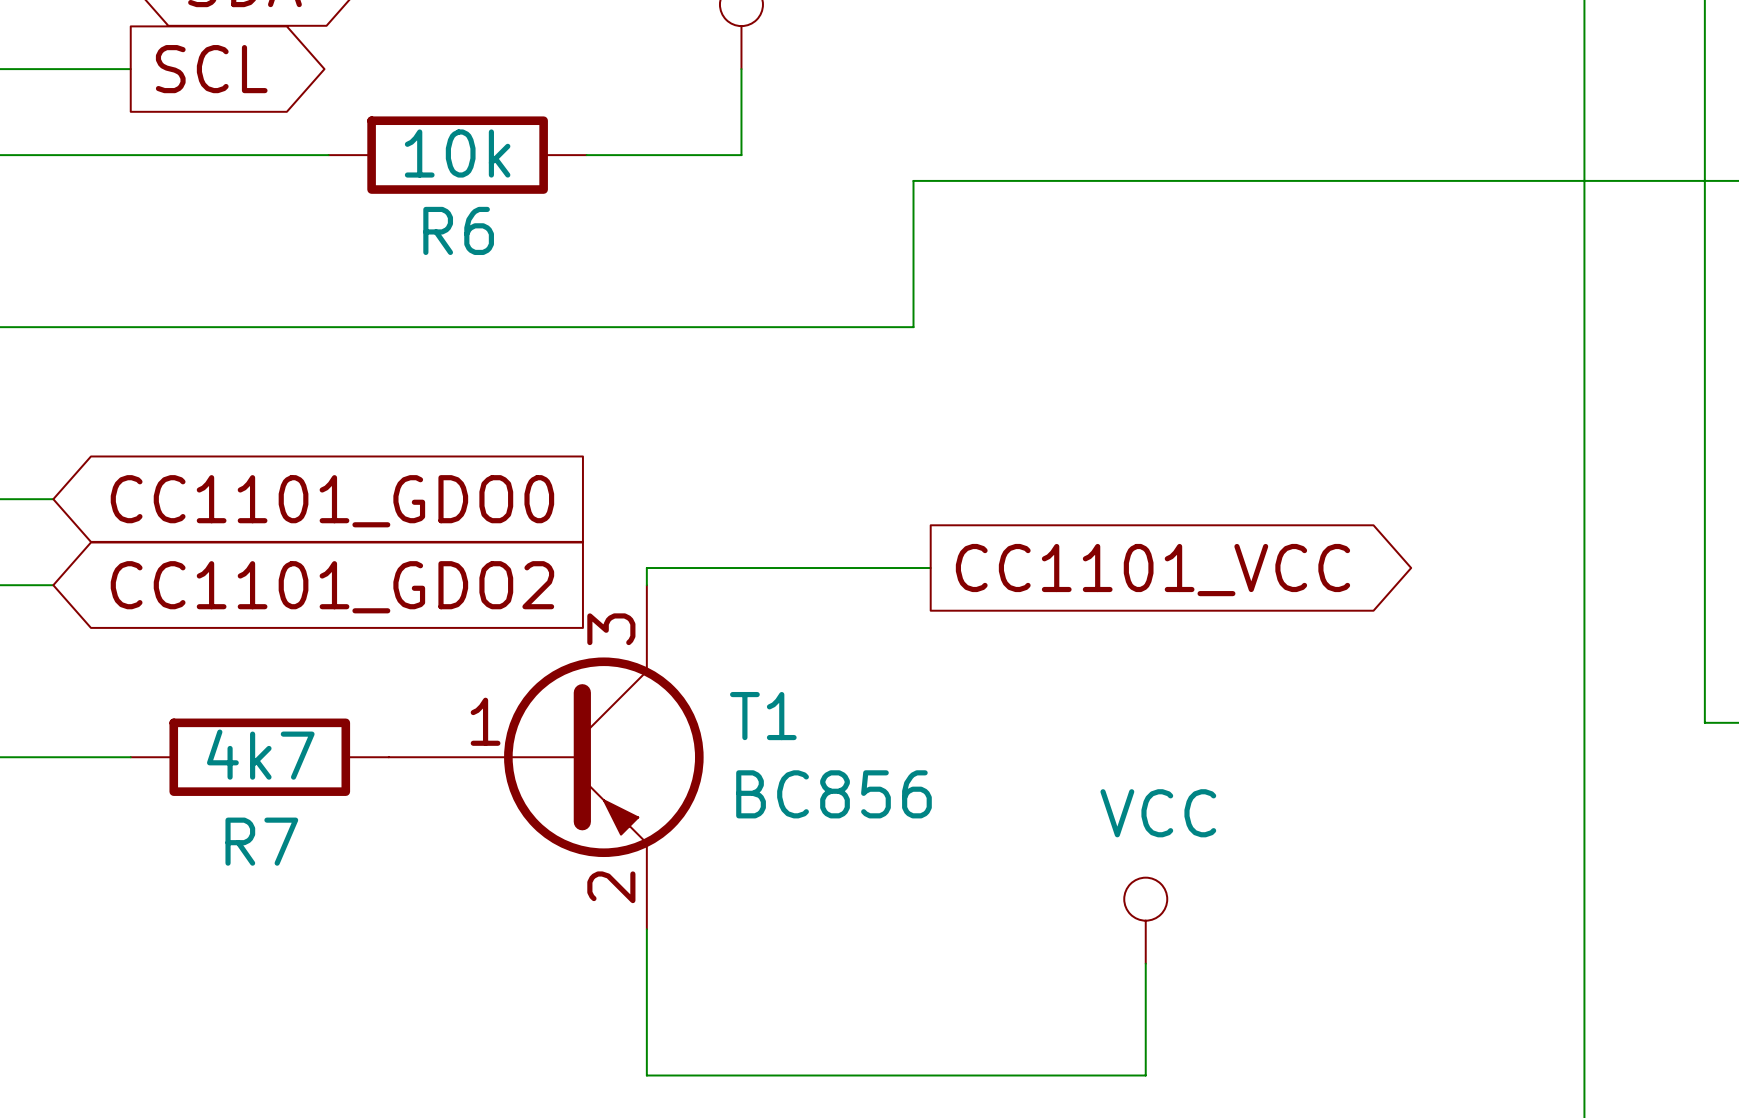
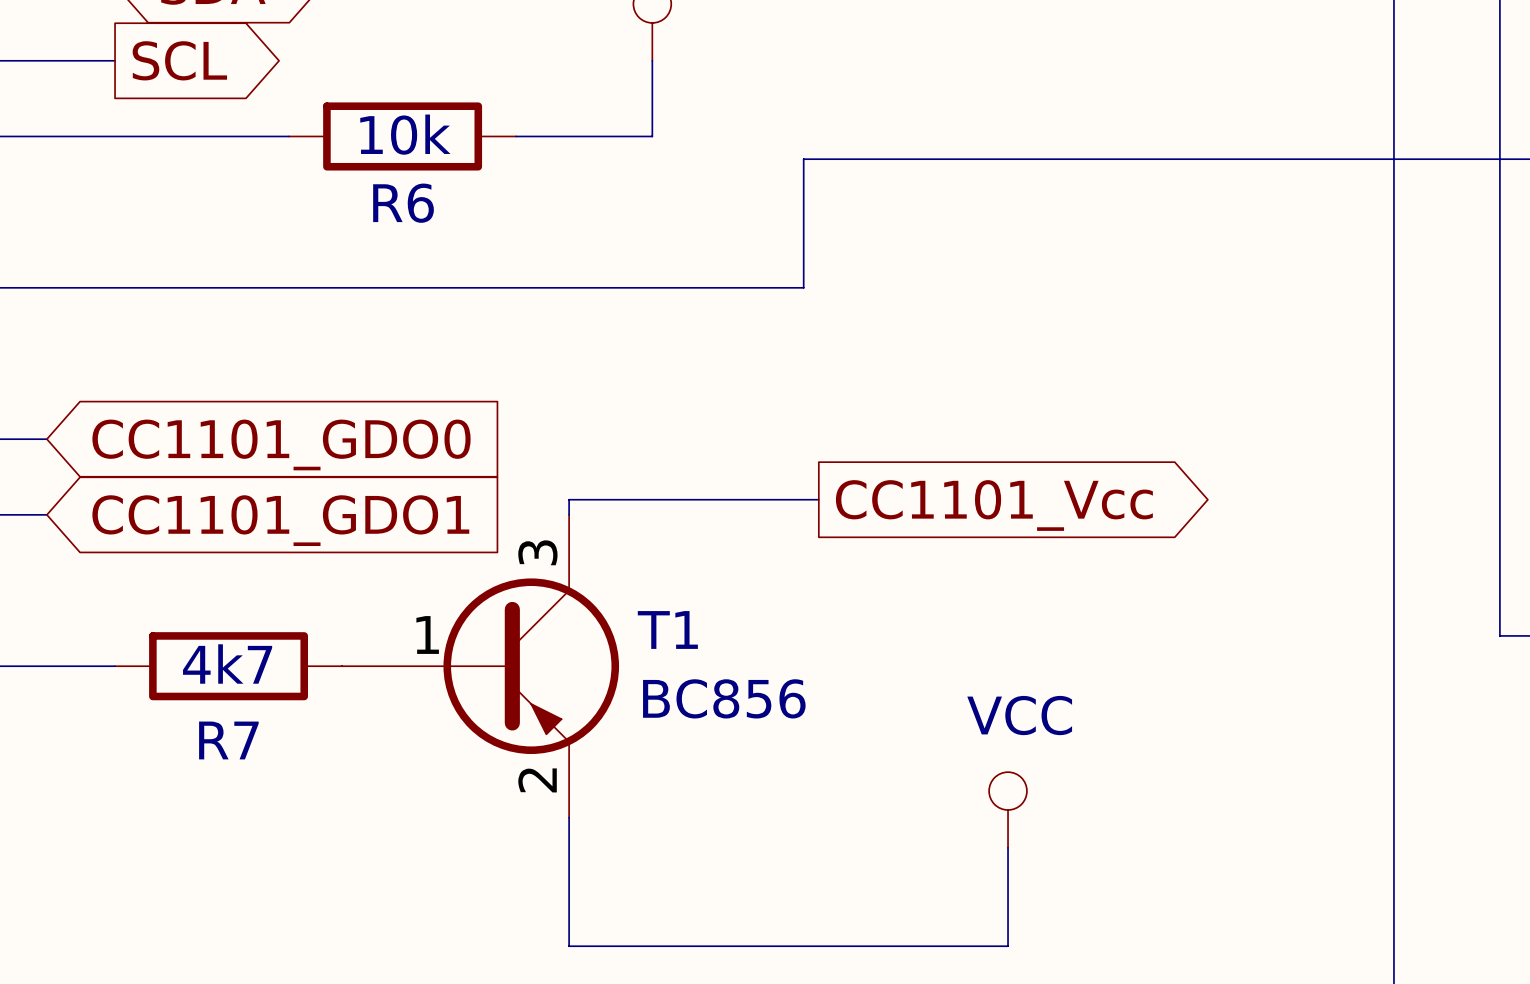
global label: CC1101_VCC (1152, 570) -> CC1101_Vcc (994, 505)
global label: CC1101_GDO2 (332, 587) -> CC1101_GDO1 (280, 520)

